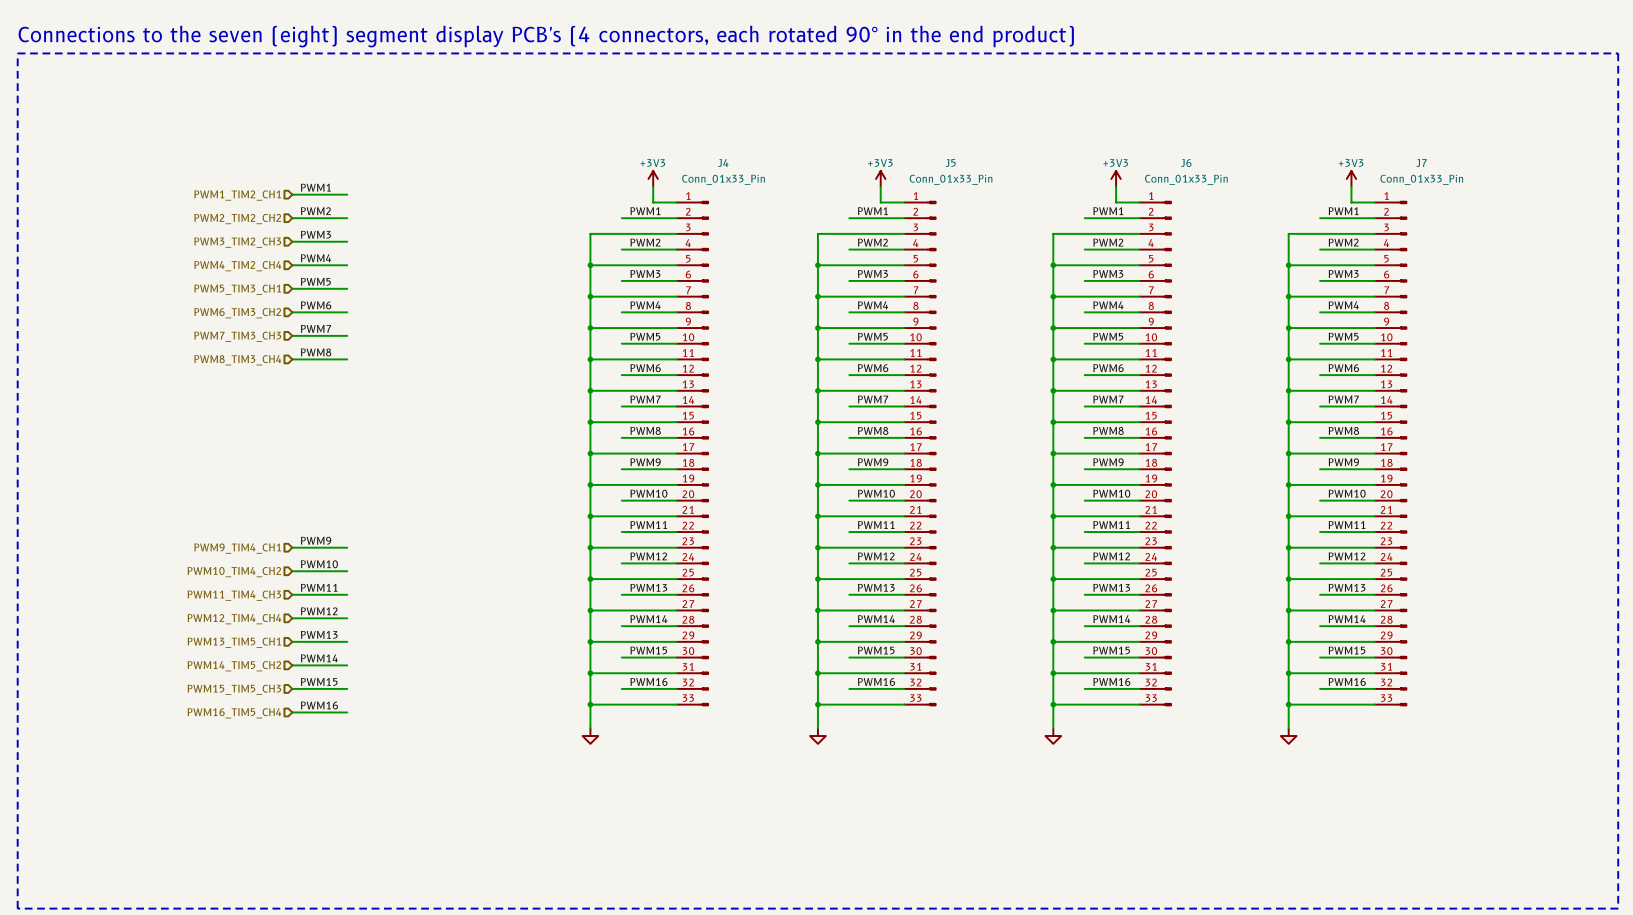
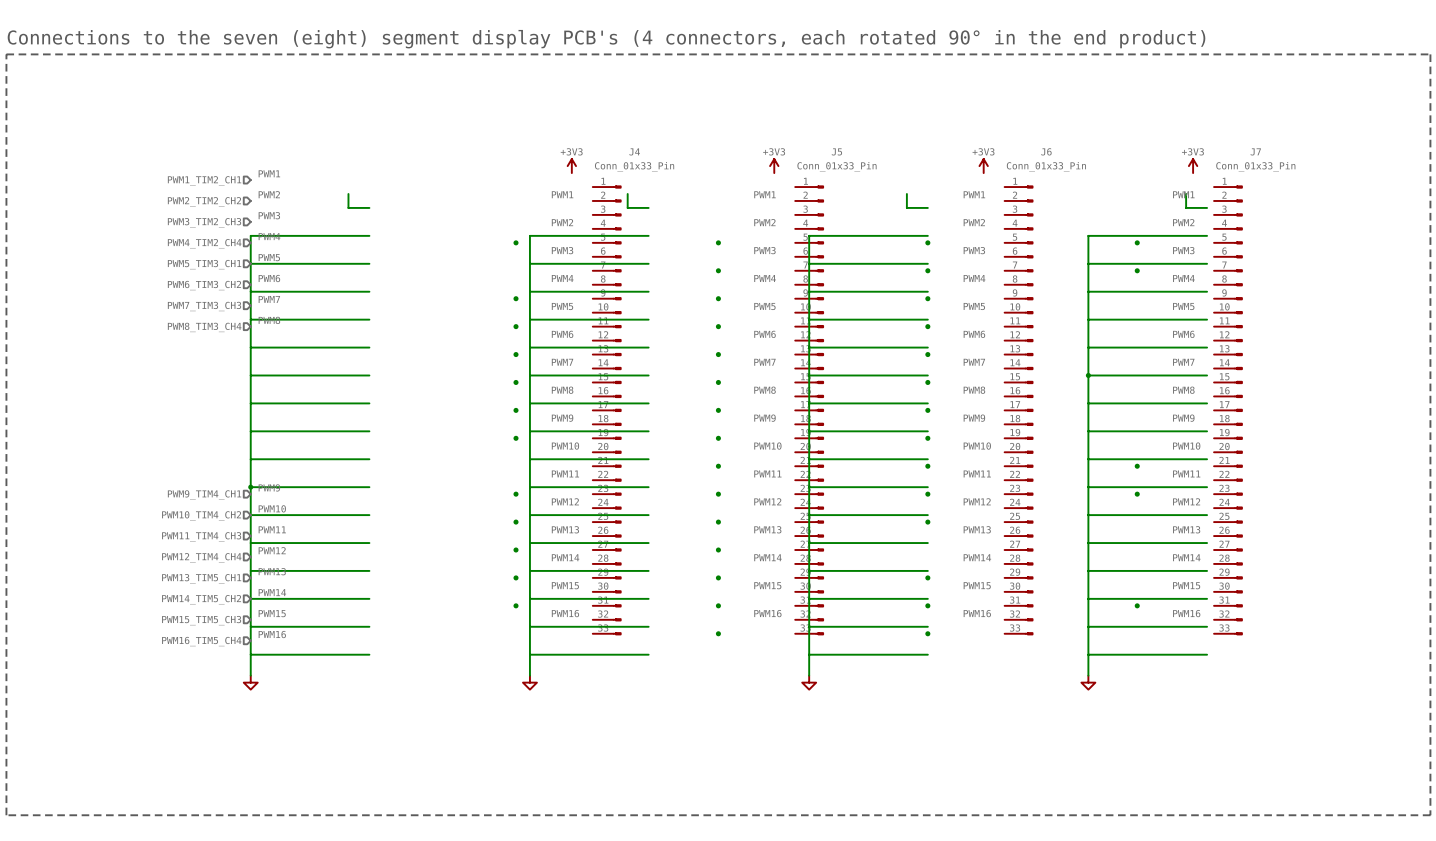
wire: (653, 186) (653, 202) (676, 202) -> (627, 194) (627, 207) (648, 207)
wire: (880, 186) (880, 202) (904, 202) -> none
wire: (1116, 186) (1116, 202) (1139, 202) -> (906, 194) (906, 207) (927, 207)
wire: (1351, 186) (1351, 202) (1374, 202) -> (1186, 194) (1186, 207) (1207, 207)
wire: (292, 194) (347, 194) -> none
wire: none -> (348, 194) (348, 207) (369, 207)
wire: (292, 218) (347, 218) -> none
wire: (621, 218) (676, 218) -> none
wire: (849, 218) (904, 218) -> none
wire: (1084, 218) (1139, 218) -> none
wire: (1320, 218) (1374, 218) -> none
wire: (676, 233) (590, 233) (590, 728) -> none
wire: (904, 233) (817, 233) (817, 728) -> none
wire: (1139, 233) (1053, 233) (1053, 728) -> (809, 654) (927, 654)
wire: (1374, 233) (1288, 233) (1288, 728) -> none
wire: (292, 241) (347, 241) -> none
wire: (621, 249) (676, 249) -> none
wire: (849, 249) (904, 249) -> none
wire: (1084, 249) (1139, 249) -> none
wire: (1320, 249) (1374, 249) -> none
wire: none -> (369, 235) (250, 235) (250, 675)
wire: none -> (648, 235) (529, 235) (529, 675)
wire: none -> (927, 235) (809, 235) (809, 675)
wire: none -> (1207, 235) (1088, 235) (1088, 675)
wire: (292, 265) (347, 265) -> none
wire: (590, 265) (676, 265) -> none
wire: (817, 265) (904, 265) -> none
wire: (1053, 265) (1139, 265) -> none
wire: (1288, 265) (1374, 265) -> none
wire: (621, 280) (676, 280) -> none
wire: (849, 280) (904, 280) -> none
wire: (1084, 280) (1139, 280) -> none
wire: (1320, 280) (1374, 280) -> none
wire: none -> (299, 263) (369, 263)
wire: none -> (529, 263) (648, 263)
wire: none -> (809, 263) (927, 263)
wire: none -> (1088, 263) (1207, 263)
wire: (590, 296) (676, 296) -> none
junction: (590, 296) -> none
wire: (817, 296) (904, 296) -> none
wire: (1053, 296) (1139, 296) -> none
wire: (1288, 296) (1374, 296) -> none
wire: (292, 312) (347, 312) -> none
wire: (621, 312) (676, 312) -> none
wire: (849, 312) (904, 312) -> none
wire: (1084, 312) (1139, 312) -> none
wire: (1320, 312) (1374, 312) -> none
wire: none -> (250, 291) (369, 291)
wire: none -> (529, 291) (648, 291)
wire: none -> (809, 291) (927, 291)
wire: none -> (1088, 291) (1207, 291)
wire: (590, 328) (676, 328) -> none
wire: (817, 328) (904, 328) -> none
wire: (1053, 328) (1139, 328) -> none
wire: (1288, 328) (1374, 328) -> none
junction: (1288, 328) -> none
wire: (292, 335) (347, 335) -> none
wire: (621, 343) (676, 343) -> none
wire: (849, 343) (904, 343) -> none
wire: (1084, 343) (1139, 343) -> none
wire: (1320, 343) (1374, 343) -> none
wire: none -> (250, 319) (369, 319)
wire: none -> (529, 319) (648, 319)
wire: none -> (809, 319) (927, 319)
wire: none -> (1088, 319) (1207, 319)
wire: (292, 359) (347, 359) -> none
wire: (590, 359) (676, 359) -> none
wire: (817, 359) (904, 359) -> none
wire: (1053, 359) (1139, 359) -> none
wire: (1288, 359) (1374, 359) -> none
junction: (1288, 359) -> none
wire: (621, 375) (676, 375) -> none
wire: (849, 375) (904, 375) -> none
wire: (1084, 375) (1139, 375) -> none
wire: (1320, 375) (1374, 375) -> none
wire: none -> (250, 347) (369, 347)
wire: none -> (529, 347) (648, 347)
wire: none -> (809, 347) (927, 347)
wire: none -> (1088, 347) (1207, 347)
wire: (590, 390) (676, 390) -> none
wire: (817, 390) (904, 390) -> none
wire: (1053, 390) (1139, 390) -> none
wire: (1288, 390) (1374, 390) -> none
junction: (1288, 390) -> none
wire: (621, 406) (676, 406) -> none
wire: (849, 406) (904, 406) -> none
wire: (1084, 406) (1139, 406) -> none
wire: (1320, 406) (1374, 406) -> none
wire: none -> (250, 375) (369, 375)
wire: none -> (529, 375) (648, 375)
wire: none -> (809, 375) (927, 375)
wire: none -> (1088, 375) (1207, 375)
junction: none -> (1088, 375)
wire: (590, 422) (676, 422) -> none
wire: (817, 422) (904, 422) -> none
wire: (1053, 422) (1139, 422) -> none
wire: (1288, 422) (1374, 422) -> none
junction: (1288, 422) -> none
wire: (621, 437) (676, 437) -> none
wire: (849, 437) (904, 437) -> none
wire: (1084, 437) (1139, 437) -> none
wire: (1320, 437) (1374, 437) -> none
wire: none -> (250, 403) (369, 403)
wire: none -> (529, 403) (648, 403)
wire: none -> (809, 403) (927, 403)
wire: none -> (1088, 403) (1207, 403)
wire: (590, 453) (676, 453) -> none
wire: (817, 453) (904, 453) -> none
wire: (1053, 453) (1139, 453) -> none
wire: (1288, 453) (1374, 453) -> none
junction: (1288, 453) -> none
wire: (621, 469) (676, 469) -> none
wire: (849, 469) (904, 469) -> none
wire: (1084, 469) (1139, 469) -> none
wire: (1320, 469) (1374, 469) -> none
wire: none -> (250, 431) (369, 431)
wire: none -> (529, 431) (648, 431)
wire: none -> (809, 431) (927, 431)
wire: none -> (1088, 431) (1207, 431)
wire: (590, 484) (676, 484) -> none
wire: (817, 484) (904, 484) -> none
wire: (1053, 484) (1139, 484) -> none
wire: (1288, 484) (1374, 484) -> none
junction: (1288, 484) -> none
wire: (621, 500) (676, 500) -> none
wire: (849, 500) (904, 500) -> none
wire: (1084, 500) (1139, 500) -> none
wire: (1320, 500) (1374, 500) -> none
wire: none -> (250, 459) (369, 459)
wire: none -> (529, 459) (648, 459)
wire: none -> (809, 459) (927, 459)
wire: none -> (1088, 459) (1207, 459)
wire: (590, 516) (676, 516) -> none
junction: (590, 516) -> none
wire: (817, 516) (904, 516) -> none
wire: (1053, 516) (1139, 516) -> none
wire: (1288, 516) (1374, 516) -> none
wire: (621, 532) (676, 532) -> none
wire: (849, 532) (904, 532) -> none
wire: (1084, 532) (1139, 532) -> none
wire: (1320, 532) (1374, 532) -> none
wire: none -> (250, 487) (369, 487)
junction: none -> (250, 487)
wire: none -> (529, 487) (648, 487)
wire: none -> (809, 487) (927, 487)
wire: none -> (1088, 487) (1207, 487)
wire: (292, 547) (347, 547) -> none
wire: (590, 547) (676, 547) -> none
wire: (817, 547) (904, 547) -> none
wire: (1053, 547) (1139, 547) -> none
wire: (1288, 547) (1374, 547) -> none
wire: (621, 563) (676, 563) -> none
wire: (849, 563) (904, 563) -> none
wire: (1084, 563) (1139, 563) -> none
wire: (1320, 563) (1374, 563) -> none
wire: none -> (299, 515) (369, 515)
wire: none -> (529, 515) (648, 515)
wire: none -> (809, 515) (927, 515)
wire: none -> (1088, 515) (1207, 515)
wire: (590, 579) (676, 579) -> none
wire: (817, 579) (904, 579) -> none
wire: (1053, 579) (1139, 579) -> none
wire: (1288, 579) (1374, 579) -> none
junction: (1288, 579) -> none
wire: (292, 594) (347, 594) -> none
wire: (621, 594) (676, 594) -> none
wire: (849, 594) (904, 594) -> none
wire: (1084, 594) (1139, 594) -> none
wire: (1320, 594) (1374, 594) -> none
wire: none -> (250, 543) (369, 543)
wire: none -> (529, 543) (648, 543)
wire: none -> (809, 543) (927, 543)
wire: none -> (1088, 543) (1207, 543)
wire: (590, 610) (676, 610) -> none
wire: (817, 610) (904, 610) -> none
wire: (1053, 610) (1139, 610) -> none
junction: (1053, 610) -> none
wire: (1288, 610) (1374, 610) -> none
junction: (1288, 610) -> none
wire: (292, 618) (347, 618) -> none
wire: (621, 626) (676, 626) -> none
wire: (849, 626) (904, 626) -> none
wire: (1084, 626) (1139, 626) -> none
wire: (1320, 626) (1374, 626) -> none
wire: none -> (250, 570) (369, 570)
wire: none -> (529, 570) (648, 570)
wire: none -> (809, 570) (927, 570)
wire: none -> (1088, 570) (1207, 570)
wire: (292, 641) (347, 641) -> none
wire: (590, 641) (676, 641) -> none
wire: (817, 641) (904, 641) -> none
wire: (1053, 641) (1139, 641) -> none
wire: (1288, 641) (1374, 641) -> none
junction: (1288, 641) -> none
wire: (621, 657) (676, 657) -> none
wire: (849, 657) (904, 657) -> none
wire: (1084, 657) (1139, 657) -> none
wire: (1320, 657) (1374, 657) -> none
wire: none -> (299, 598) (369, 598)
wire: none -> (529, 598) (648, 598)
wire: none -> (809, 598) (927, 598)
wire: none -> (1088, 598) (1207, 598)
wire: (590, 673) (676, 673) -> none
wire: (817, 673) (904, 673) -> none
wire: (1053, 673) (1139, 673) -> none
wire: (1288, 673) (1374, 673) -> none
wire: (292, 688) (347, 688) -> none
wire: (621, 688) (676, 688) -> none
wire: (849, 688) (904, 688) -> none
wire: (1084, 688) (1139, 688) -> none
wire: (1320, 688) (1374, 688) -> none
wire: none -> (250, 626) (369, 626)
wire: none -> (529, 626) (648, 626)
wire: none -> (809, 626) (927, 626)
wire: none -> (1088, 626) (1207, 626)
wire: (590, 704) (676, 704) -> none
junction: (590, 704) -> none
wire: (817, 704) (904, 704) -> none
wire: (1053, 704) (1139, 704) -> none
wire: (1288, 704) (1374, 704) -> none
junction: (1288, 704) -> none
wire: (292, 712) (347, 712) -> none
wire: none -> (250, 654) (369, 654)
wire: none -> (529, 654) (648, 654)
wire: none -> (1088, 654) (1207, 654)
power symbol position: (590, 736) -> (529, 682)
power symbol: (817, 736) -> none
power symbol: (1053, 736) -> none
power symbol position: (1288, 736) -> (1088, 682)
power symbol: none -> (250, 682)
power symbol: none -> (809, 682)

